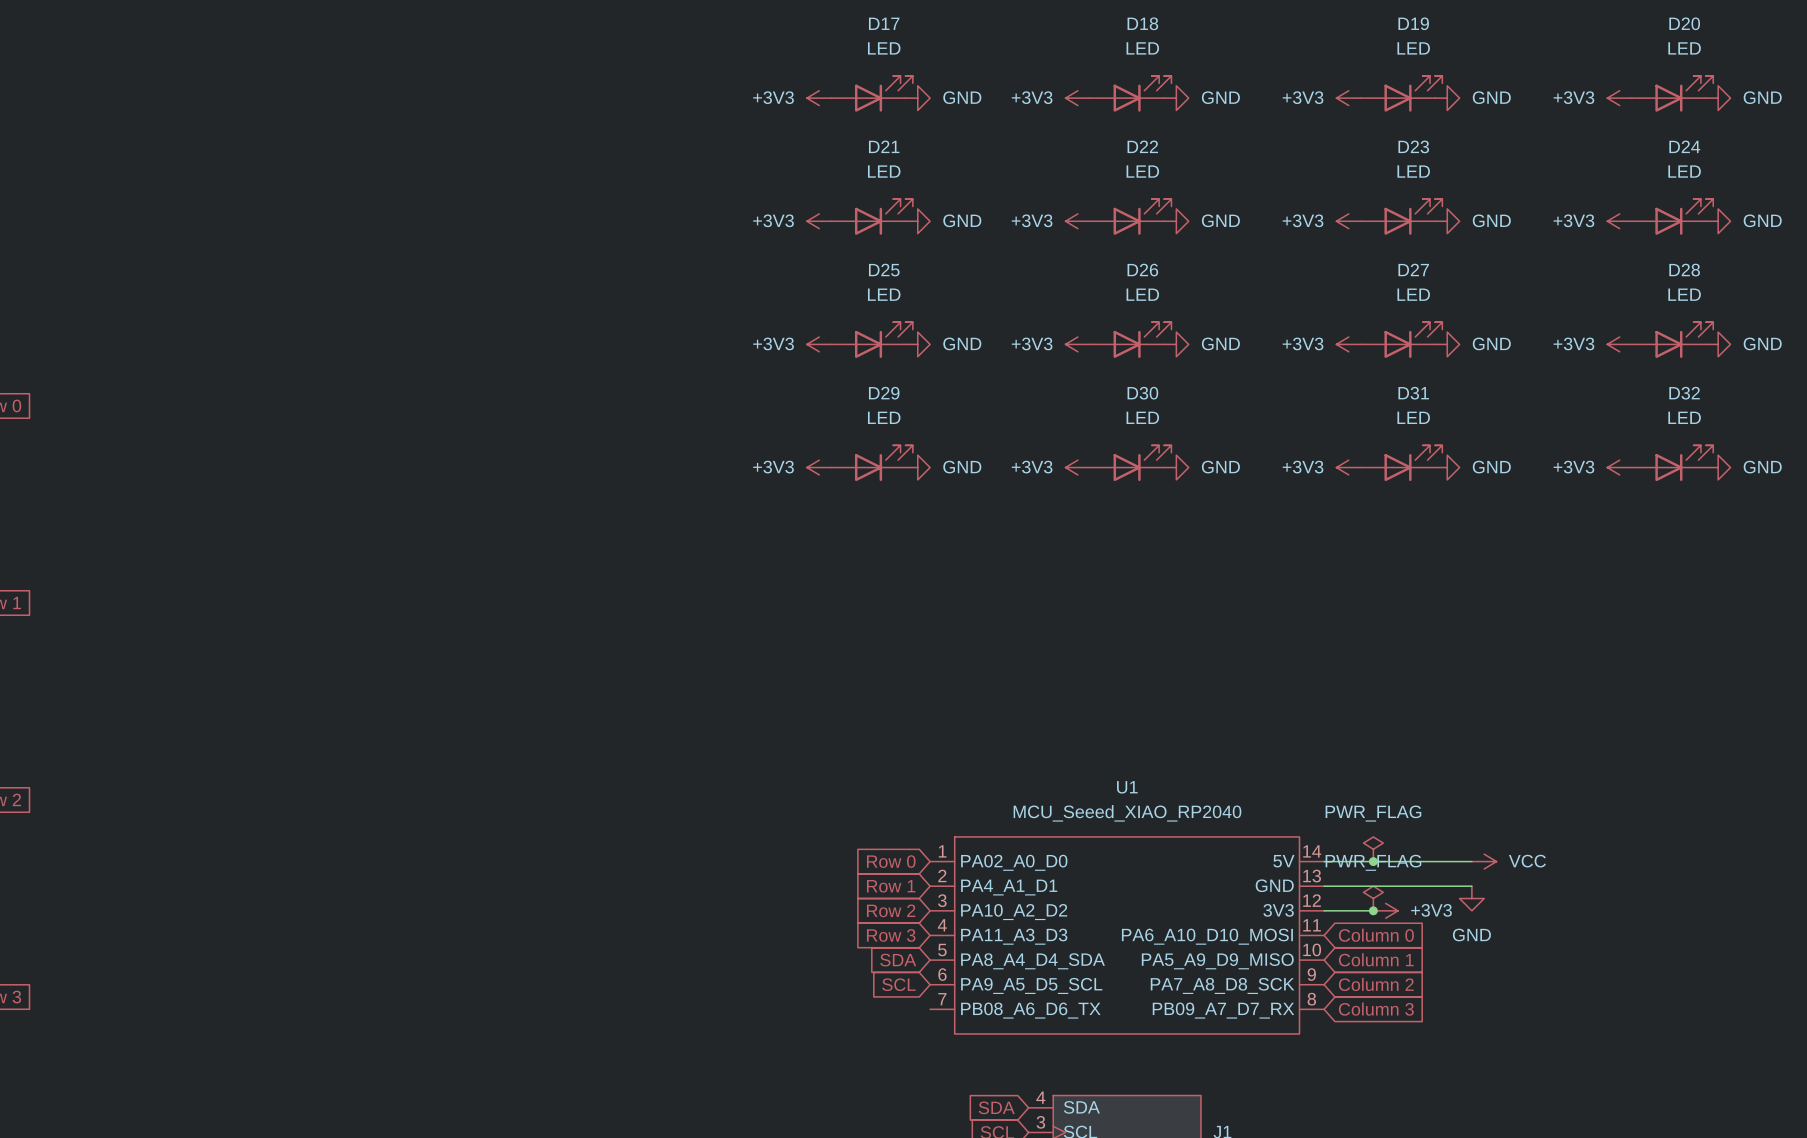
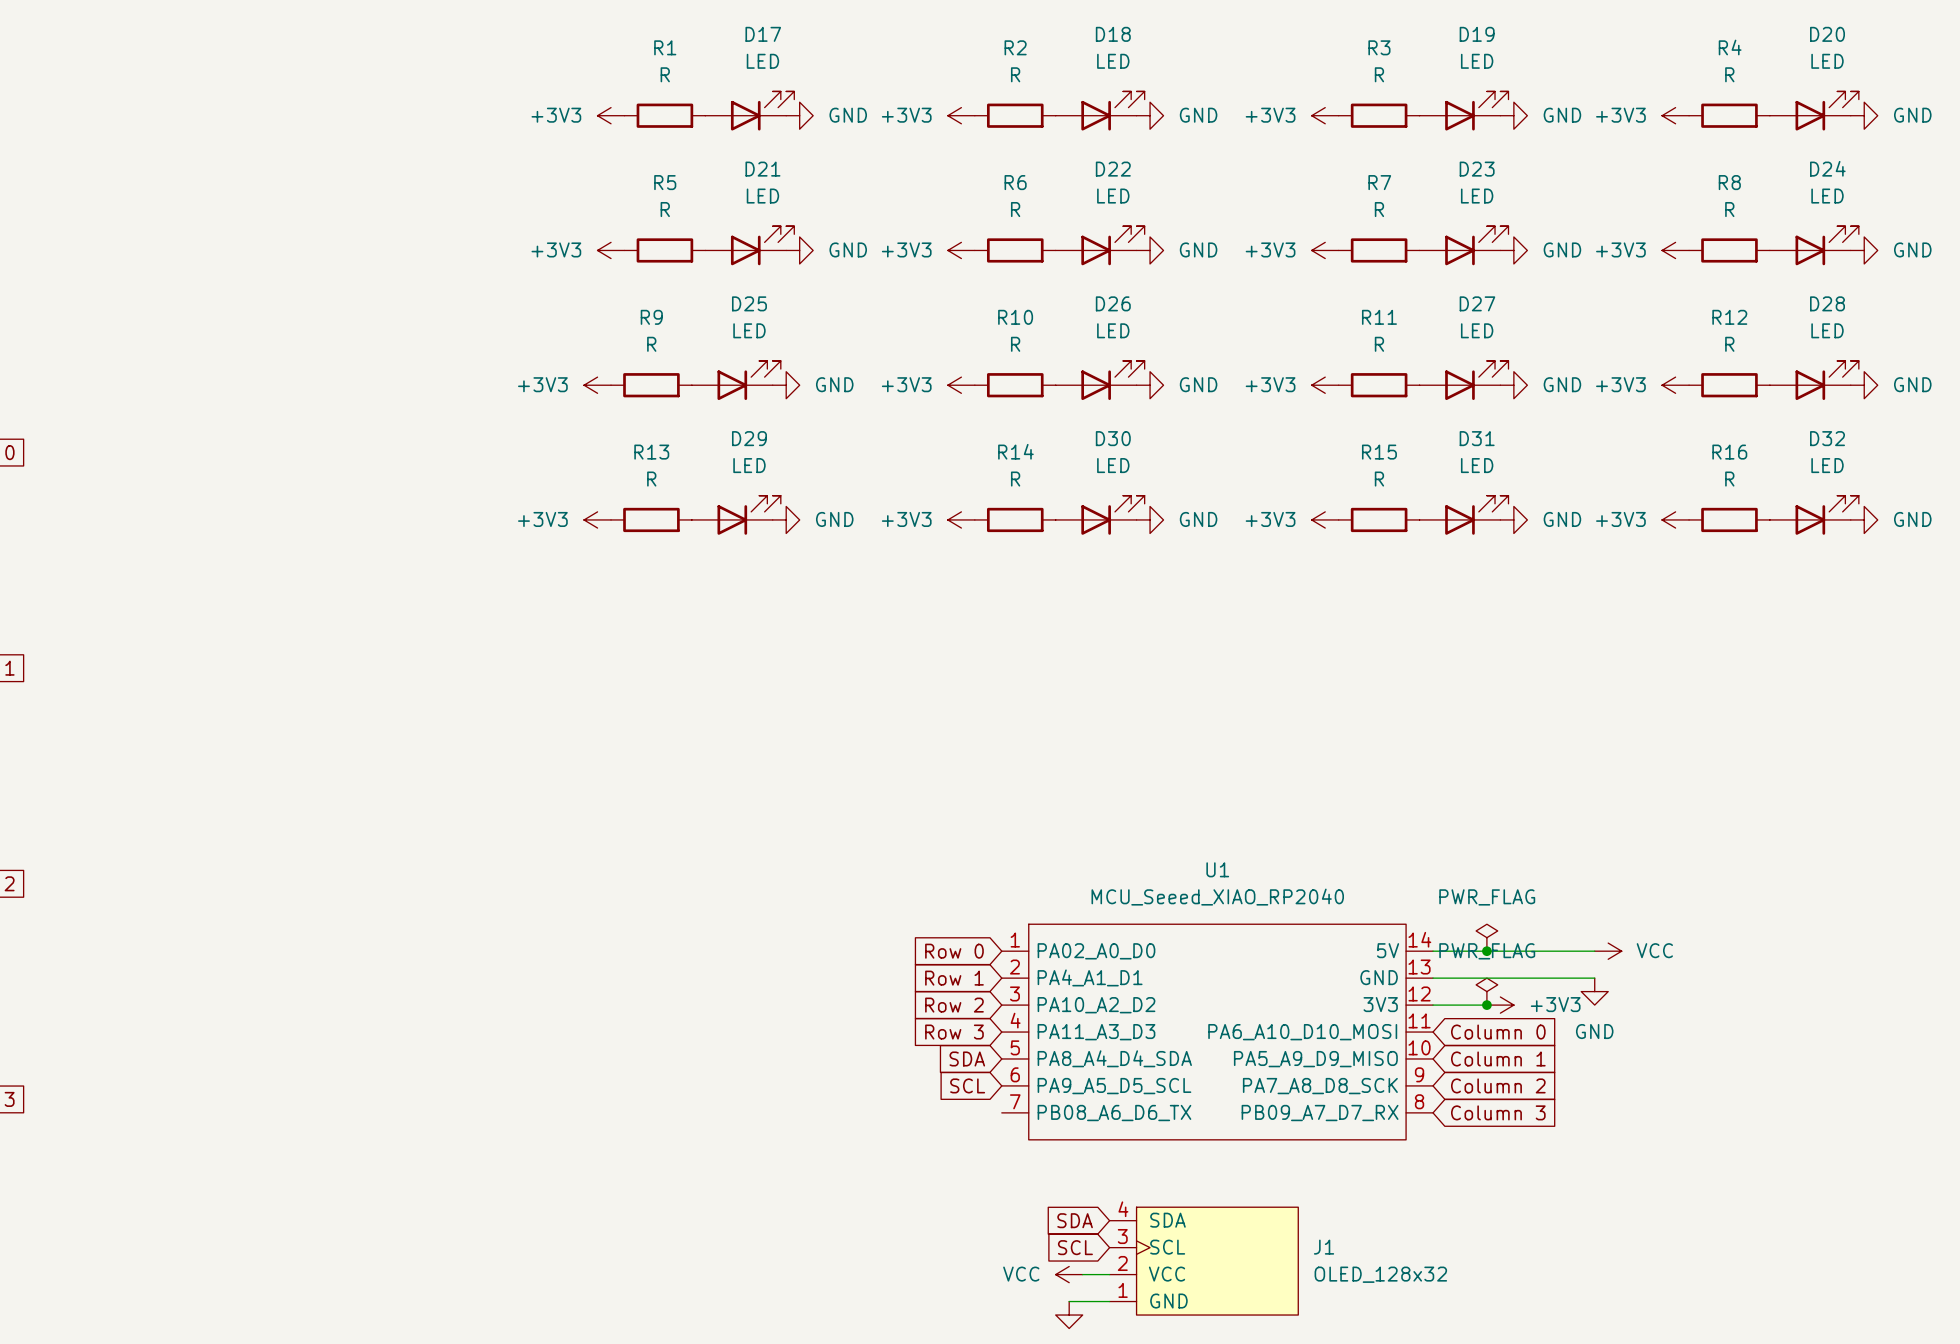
D17 position: (872, 93) -> (749, 110)
D18 position: (1130, 93) -> (1100, 110)
D19 position: (1401, 93) -> (1464, 110)
power symbol: none -> +3V3 (611, 115)
R1: none -> R (664, 115)
power symbol: none -> GND (799, 115)
power symbol: +3V3 (819, 98) -> none
power symbol: none -> +3V3 (961, 115)
power symbol: GND (917, 98) -> none
R2: none -> R (1015, 115)
power symbol: none -> GND (1150, 115)
power symbol: +3V3 (1077, 98) -> none
power symbol: GND (1176, 98) -> none
power symbol: none -> +3V3 (1325, 115)
R3: none -> R (1379, 115)
power symbol: +3V3 (1348, 98) -> none
power symbol position: GND (1447, 98) -> GND (1513, 115)
power symbol: none -> +3V3 (1675, 115)
R4: none -> R (1729, 115)
power symbol: +3V3 (1619, 98) -> none
D21 position: (872, 216) -> (749, 245)
D22 position: (1130, 216) -> (1100, 245)
D23 position: (1401, 216) -> (1464, 245)
power symbol: none -> +3V3 (611, 250)
R5: none -> R (664, 250)
power symbol: none -> GND (799, 250)
power symbol: +3V3 (819, 221) -> none
power symbol: none -> +3V3 (961, 250)
power symbol: GND (917, 221) -> none
R6: none -> R (1015, 250)
power symbol: none -> GND (1150, 250)
power symbol: +3V3 (1077, 221) -> none
power symbol: GND (1176, 221) -> none
power symbol: none -> +3V3 (1325, 250)
R7: none -> R (1379, 250)
power symbol: +3V3 (1348, 221) -> none
power symbol position: GND (1447, 221) -> GND (1513, 250)
power symbol: none -> +3V3 (1675, 250)
R8: none -> R (1729, 250)
power symbol: +3V3 (1619, 221) -> none
D25 position: (872, 340) -> (736, 380)
D26 position: (1130, 340) -> (1100, 380)
D27 position: (1401, 340) -> (1464, 380)
power symbol: none -> +3V3 (597, 385)
R9: none -> R (651, 385)
power symbol: none -> GND (786, 385)
power symbol: +3V3 (819, 344) -> none
power symbol: none -> +3V3 (961, 385)
power symbol: GND (917, 344) -> none
R10: none -> R (1015, 385)
power symbol: none -> GND (1150, 385)
power symbol: +3V3 (1077, 344) -> none
power symbol: GND (1176, 344) -> none
power symbol: none -> +3V3 (1325, 385)
R11: none -> R (1379, 385)
power symbol: +3V3 (1348, 344) -> none
power symbol position: GND (1447, 344) -> GND (1513, 385)
power symbol: none -> +3V3 (1675, 385)
R12: none -> R (1729, 385)
power symbol: +3V3 (1619, 344) -> none
D29 position: (872, 463) -> (736, 515)
D30 position: (1130, 463) -> (1100, 515)
D31 position: (1401, 463) -> (1464, 515)
power symbol: none -> +3V3 (597, 519)
R13: none -> R (651, 519)
power symbol: none -> GND (786, 519)
power symbol: +3V3 (819, 467) -> none
power symbol: none -> +3V3 (961, 519)
power symbol: GND (917, 467) -> none
R14: none -> R (1015, 519)
power symbol: none -> GND (1150, 519)
power symbol: +3V3 (1077, 467) -> none
power symbol: GND (1176, 467) -> none
power symbol: none -> +3V3 (1325, 519)
R15: none -> R (1379, 519)
power symbol: +3V3 (1348, 467) -> none
power symbol position: GND (1447, 467) -> GND (1513, 519)
power symbol: none -> +3V3 (1675, 519)
R16: none -> R (1729, 519)
power symbol: +3V3 (1619, 467) -> none

